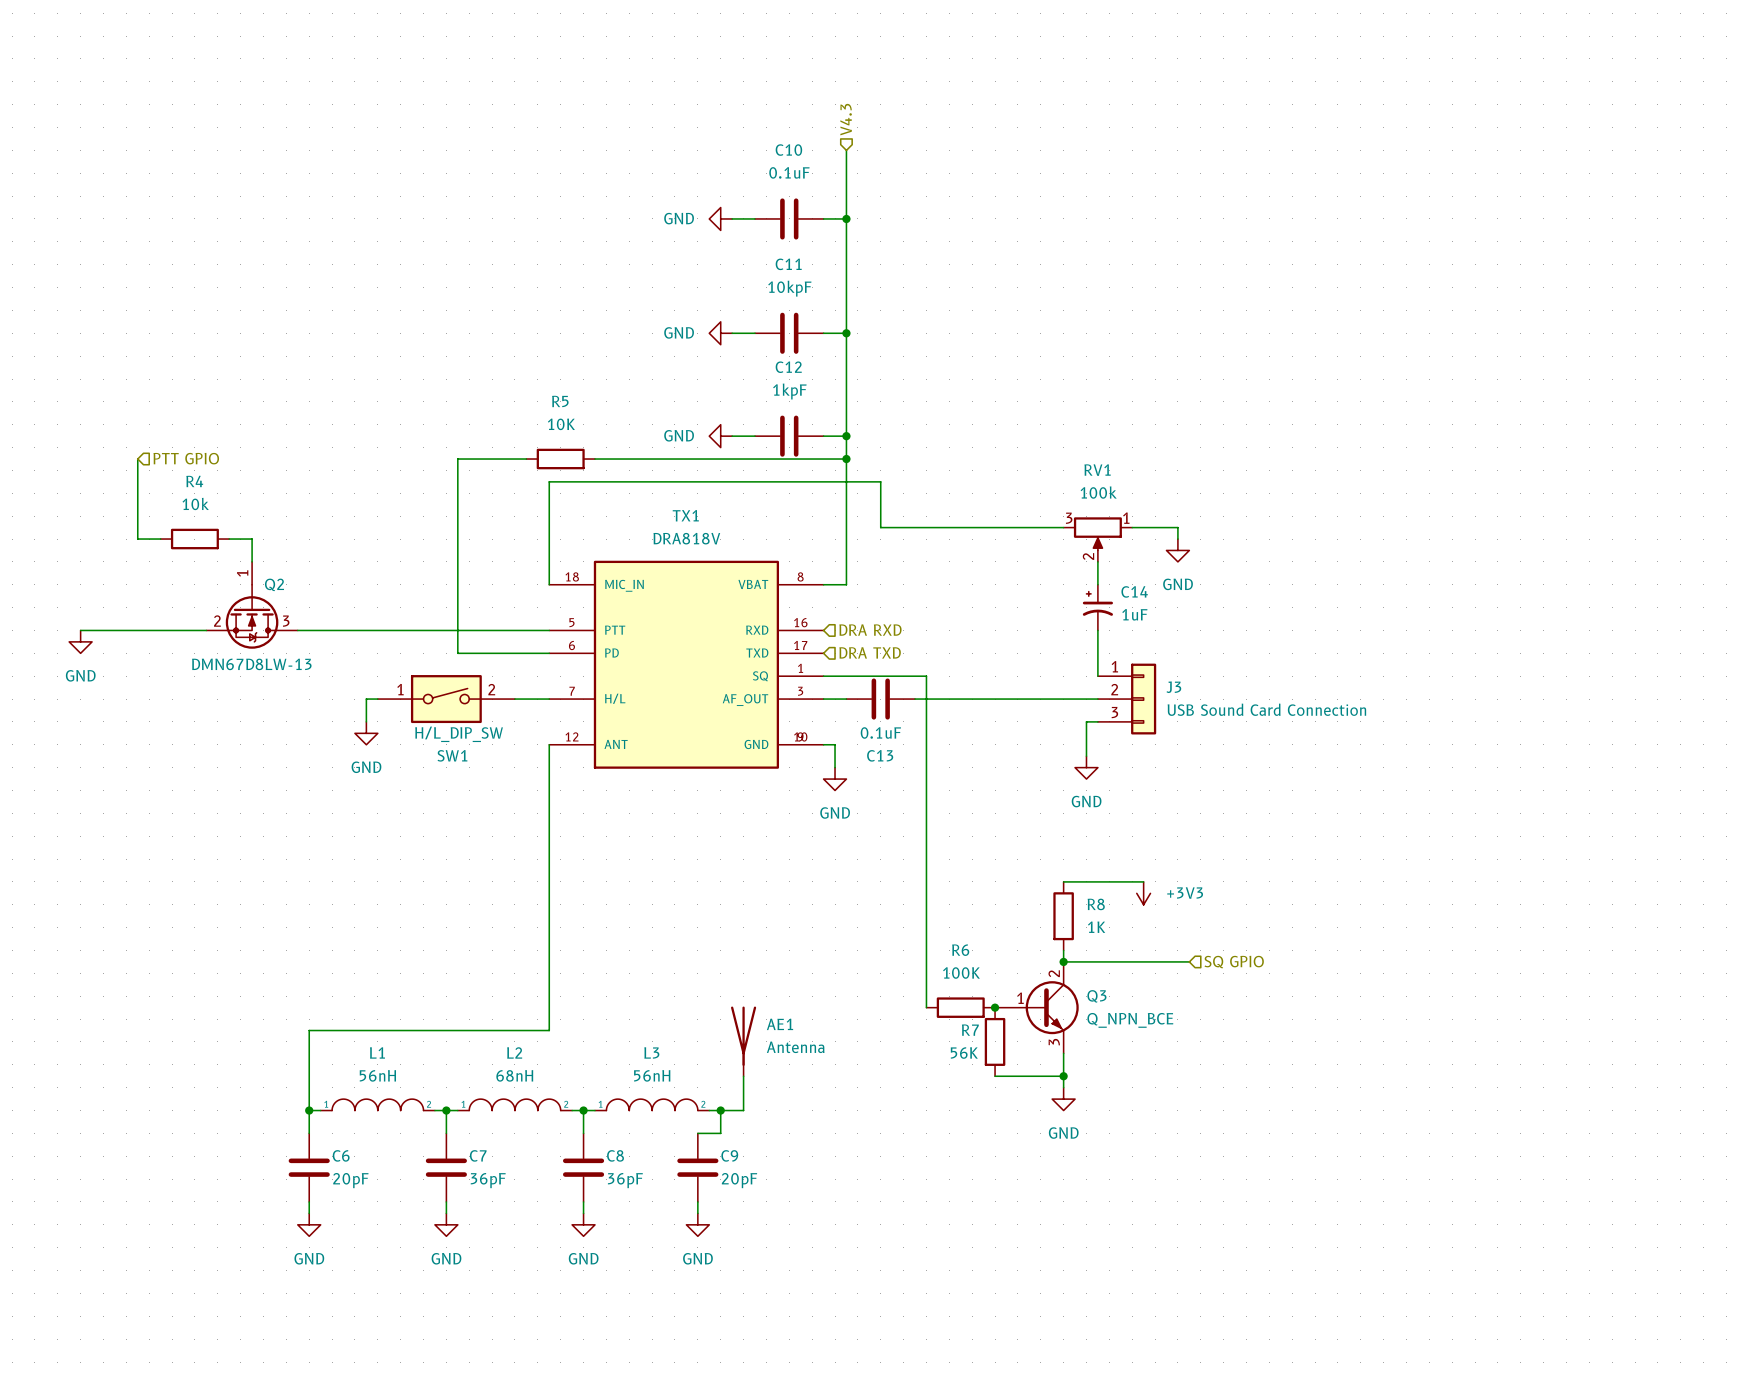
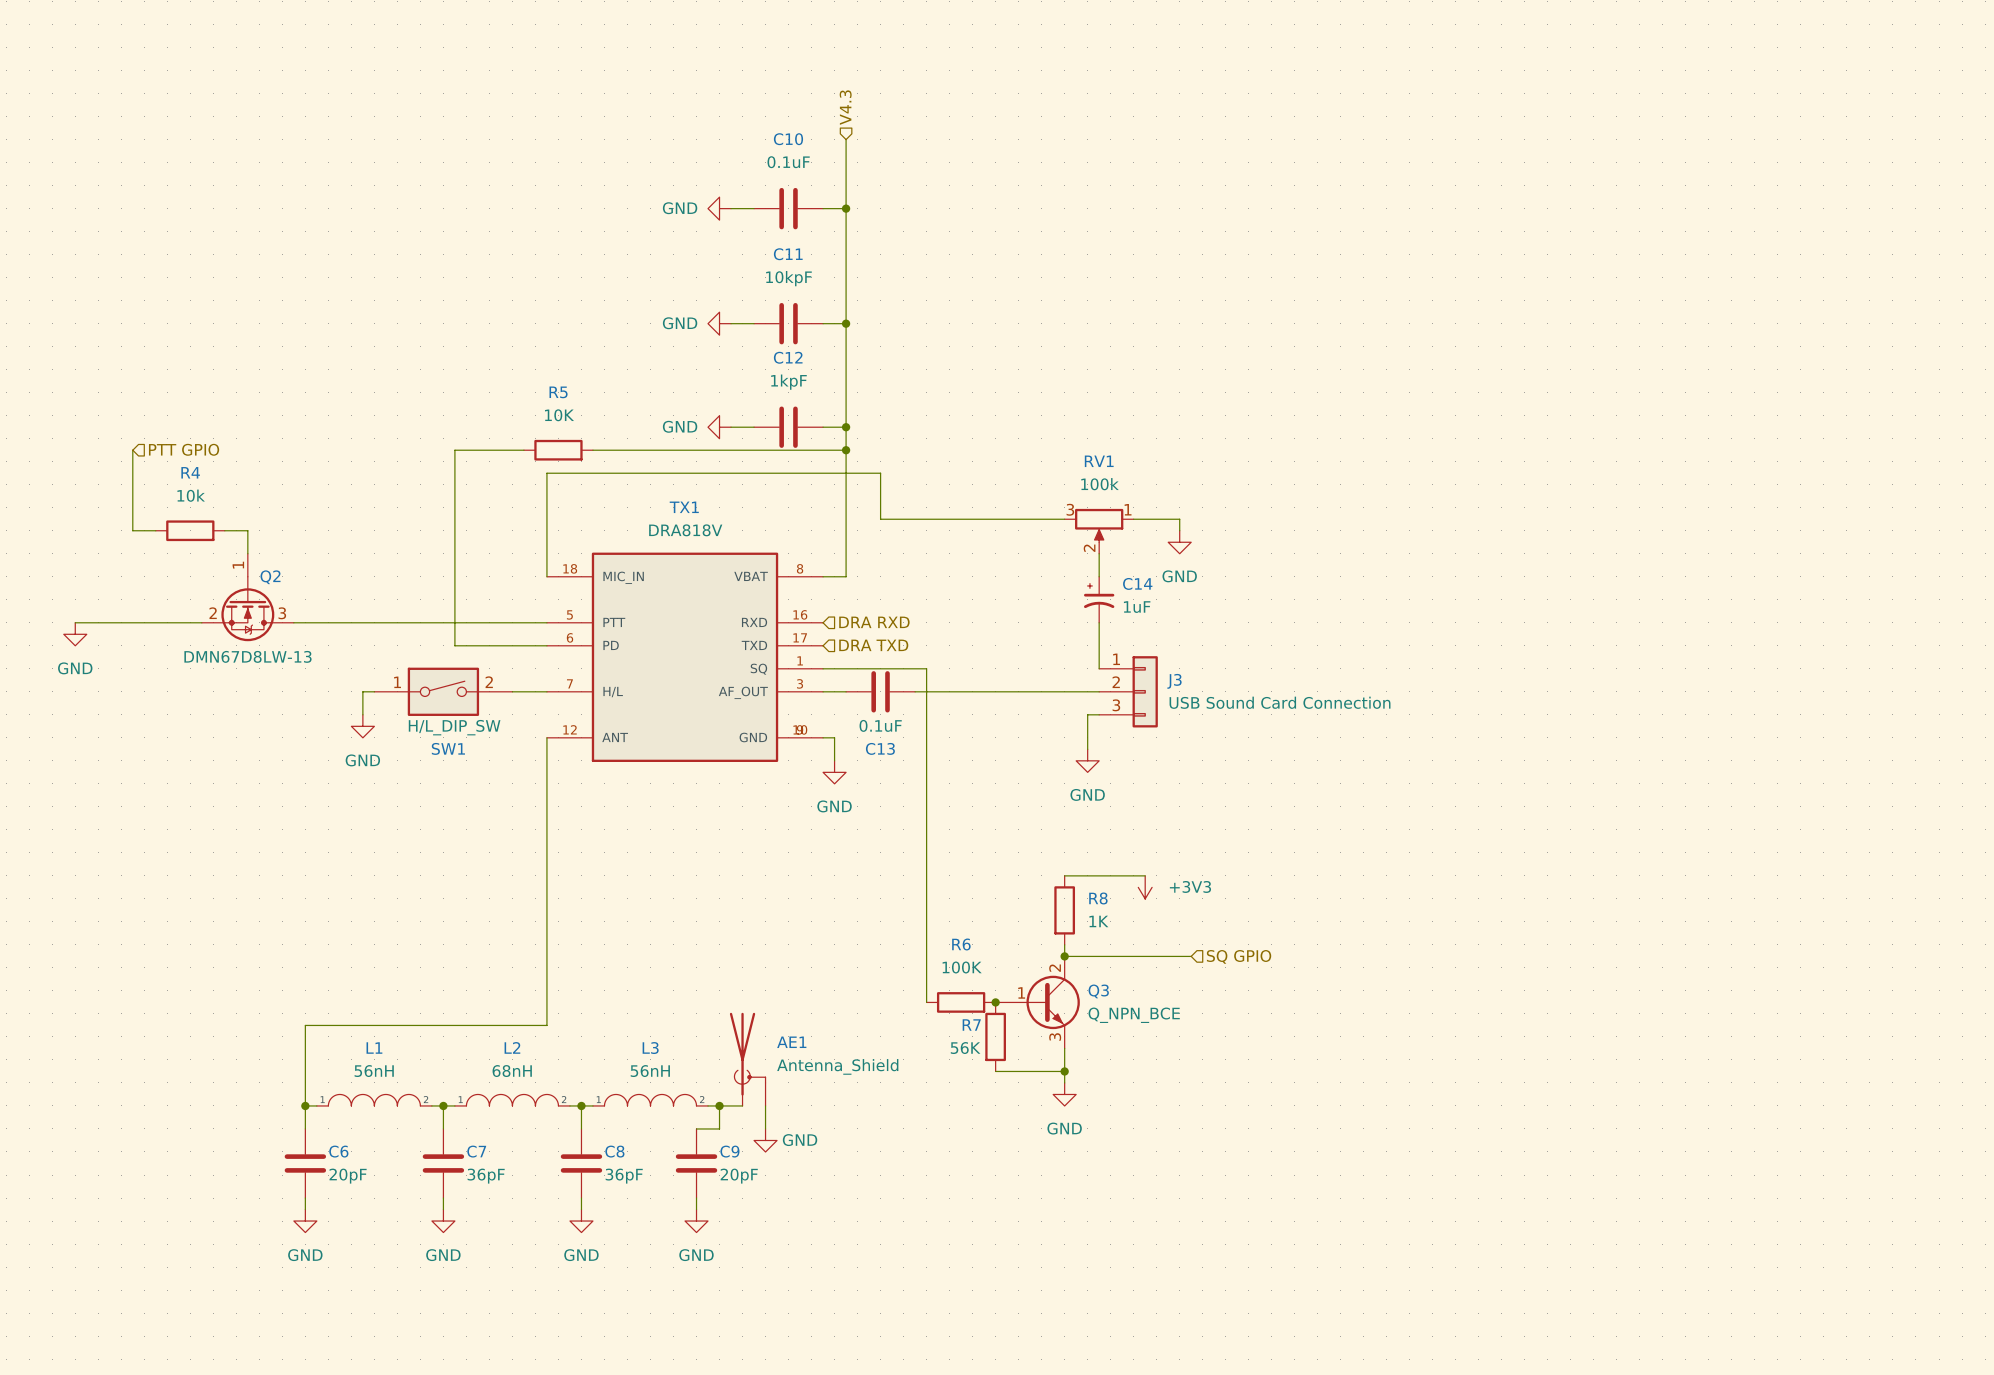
AE1 symbol: [731, 1006, 757, 1077] -> [729, 1012, 766, 1106]
AE1 value: Antenna (795, 1047) -> Antenna_Shield (837, 1066)
wire: none -> (765, 1105) (765, 1128)
power symbol: none -> GND (765, 1140)

